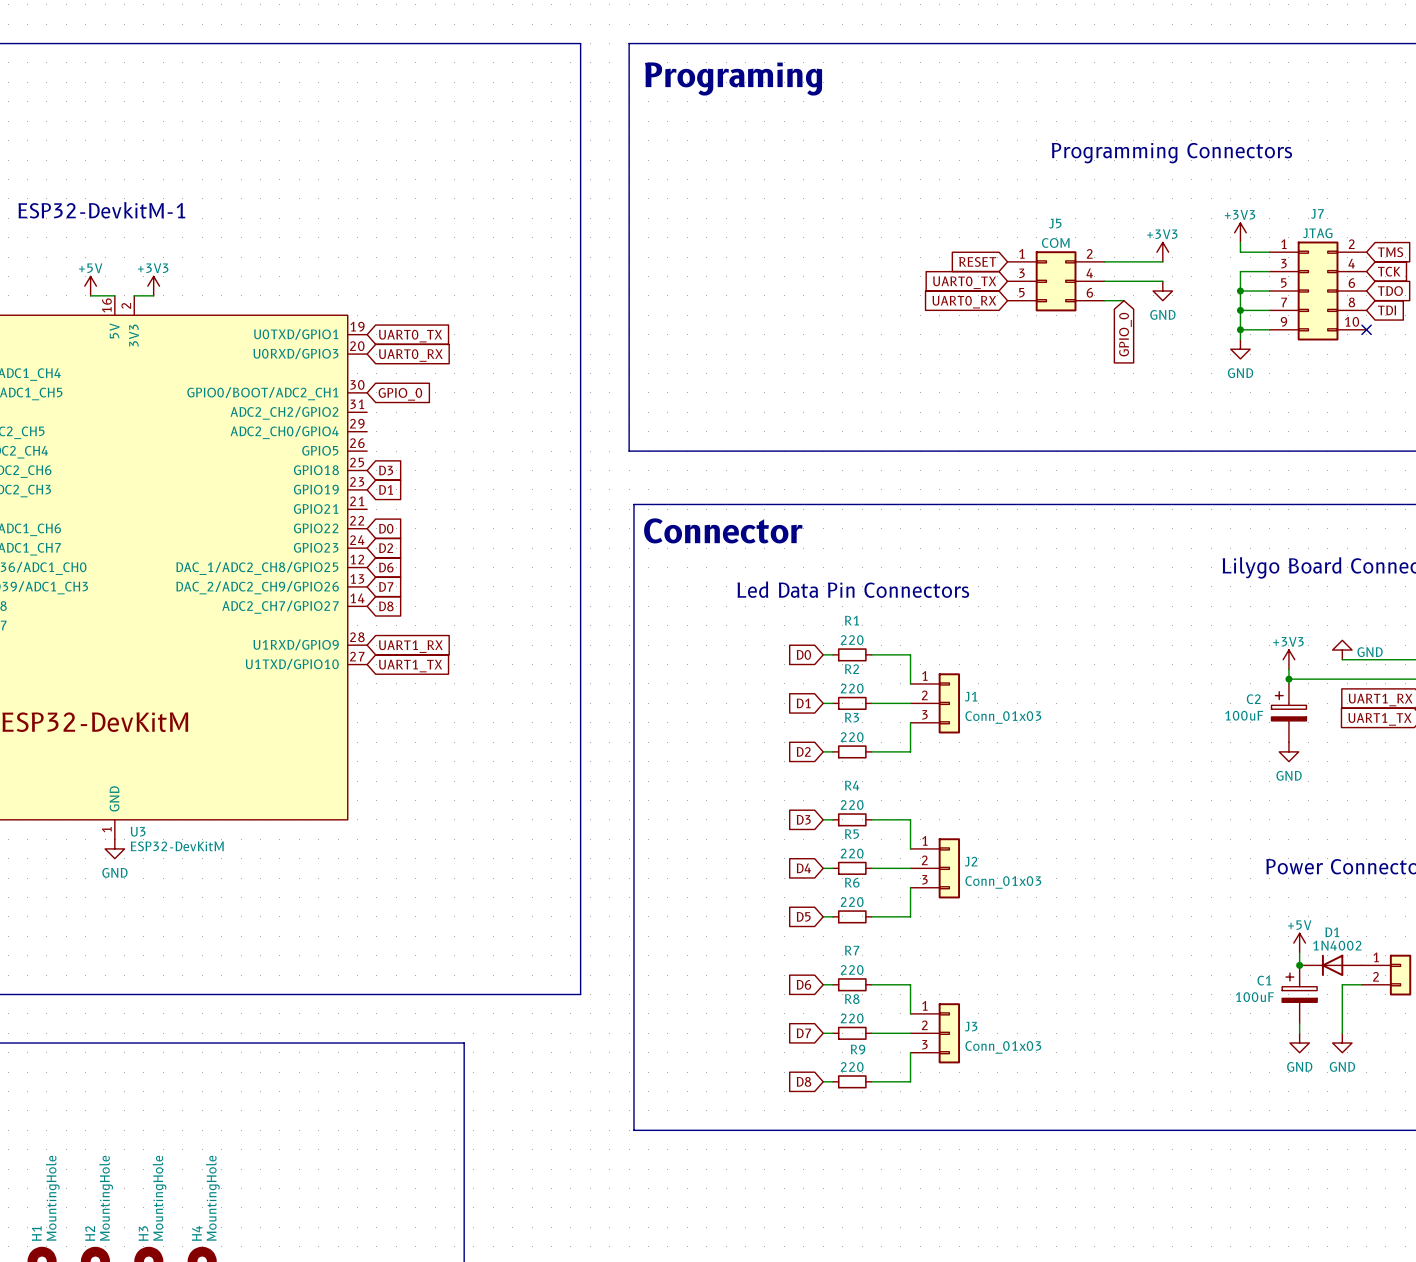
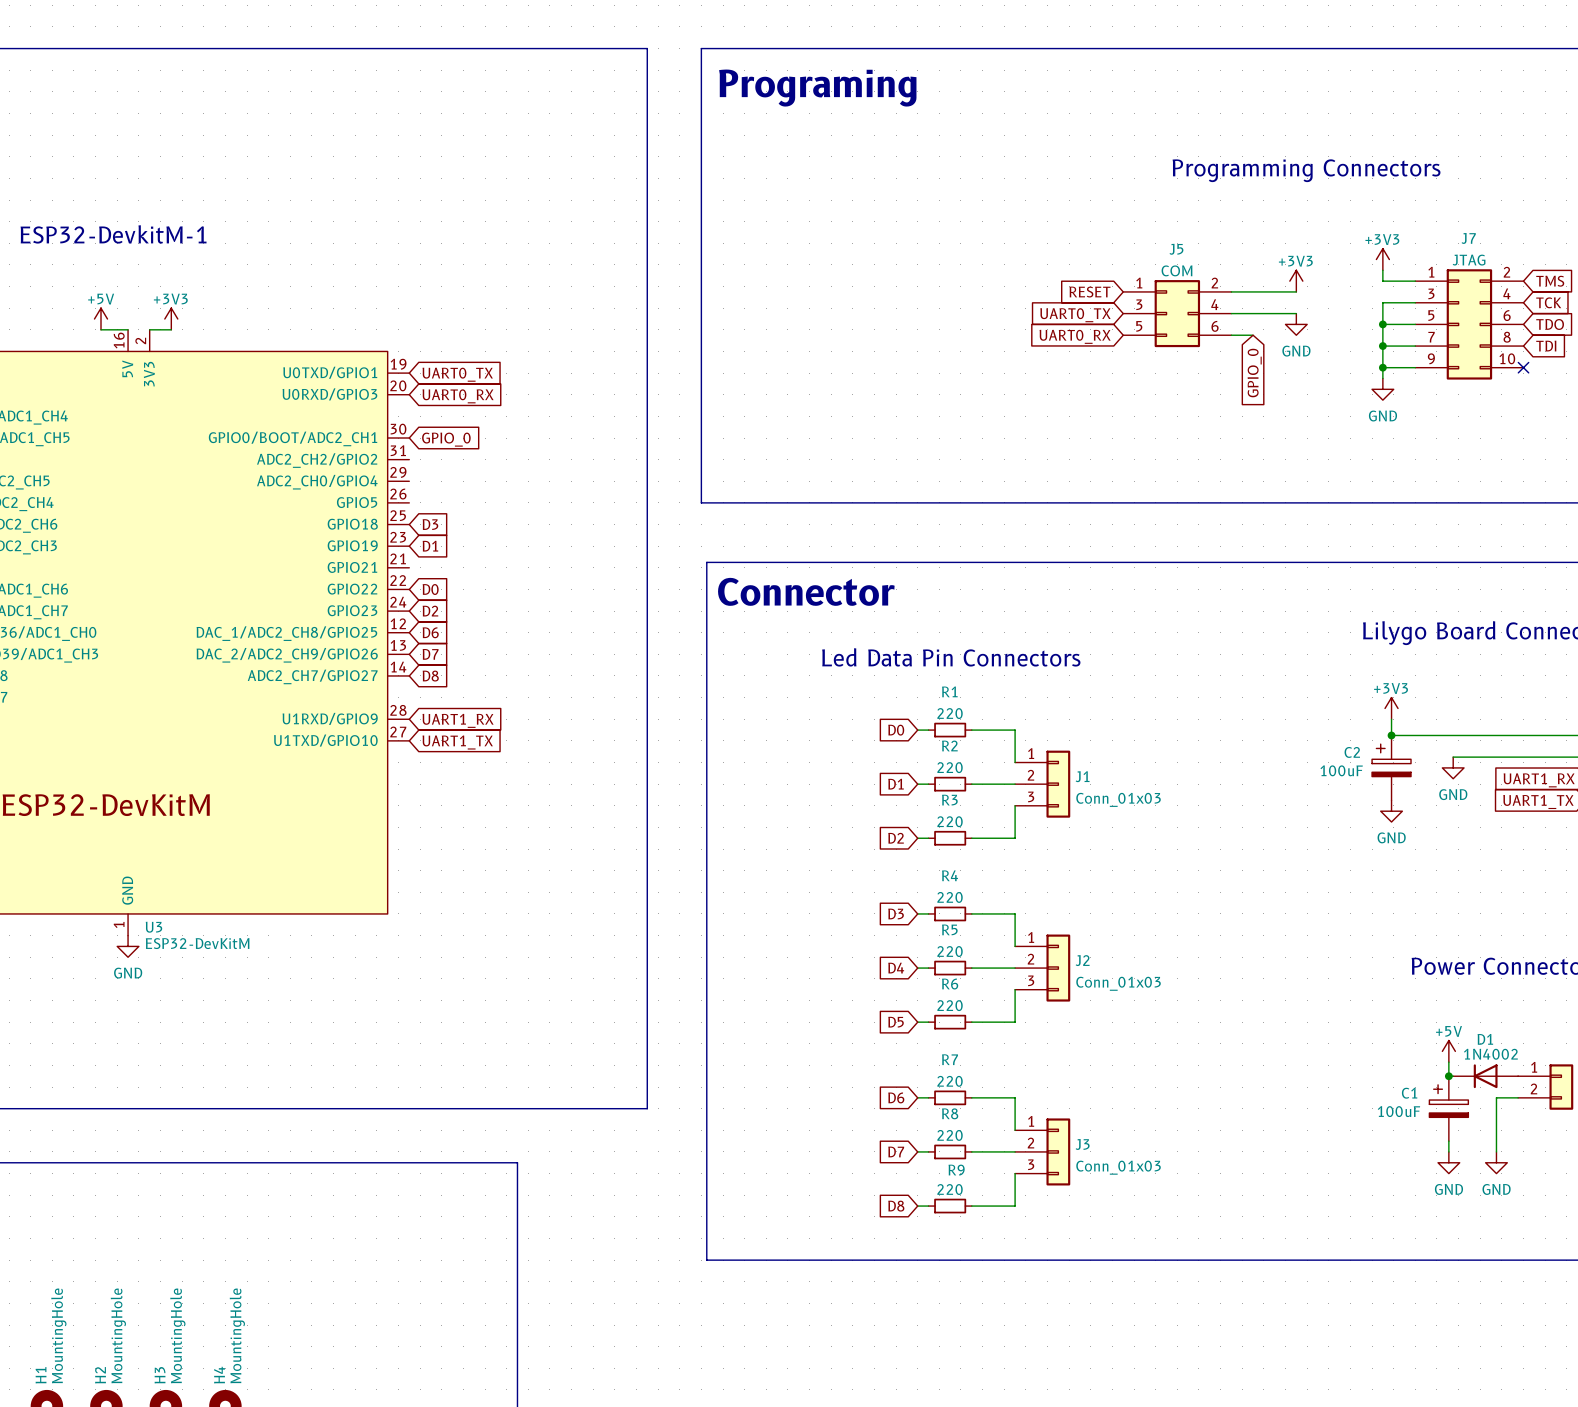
wire: none -> (1391, 719) (1391, 735) (1496, 735)
power symbol: GND (1342, 650) -> none
power symbol position: +3V3 (1288, 659) -> +3V3 (1391, 708)
wire: (1288, 669) (1288, 683) -> none
wire: (1288, 679) (1303, 679) -> none
junction position: (1288, 679) -> (1391, 735)
power symbol: none -> GND (1453, 767)
C2 position: (1288, 713) -> (1391, 767)
power symbol: none -> GND (1391, 811)
power symbol: GND (1288, 751) -> none

